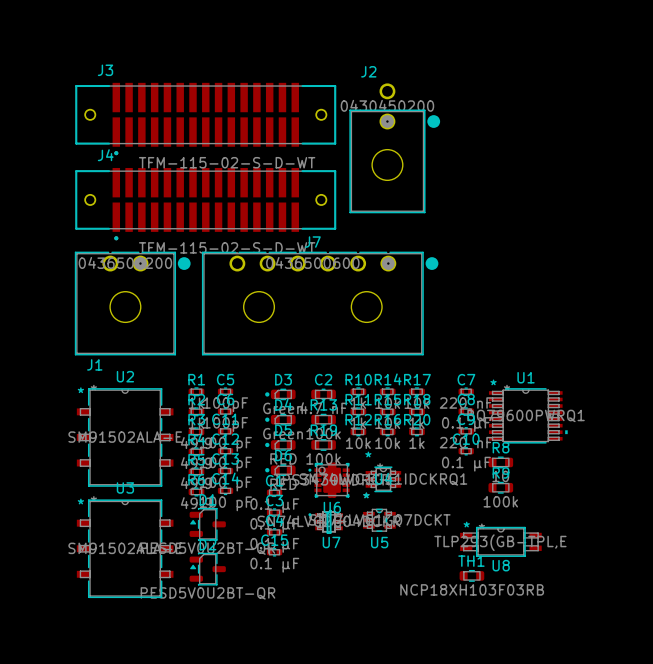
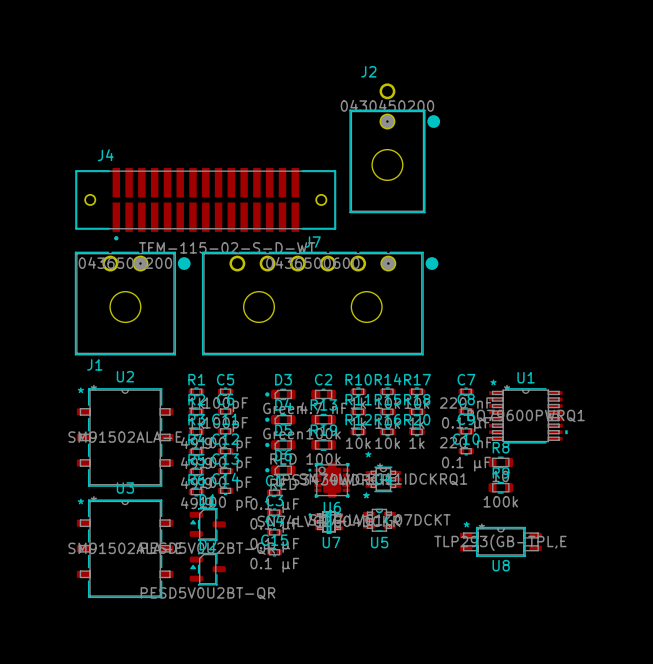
J3: TFM-115-02-S-D-WT (205, 119) -> none
TH1: NCP18XH103F03RB (471, 575) -> none

